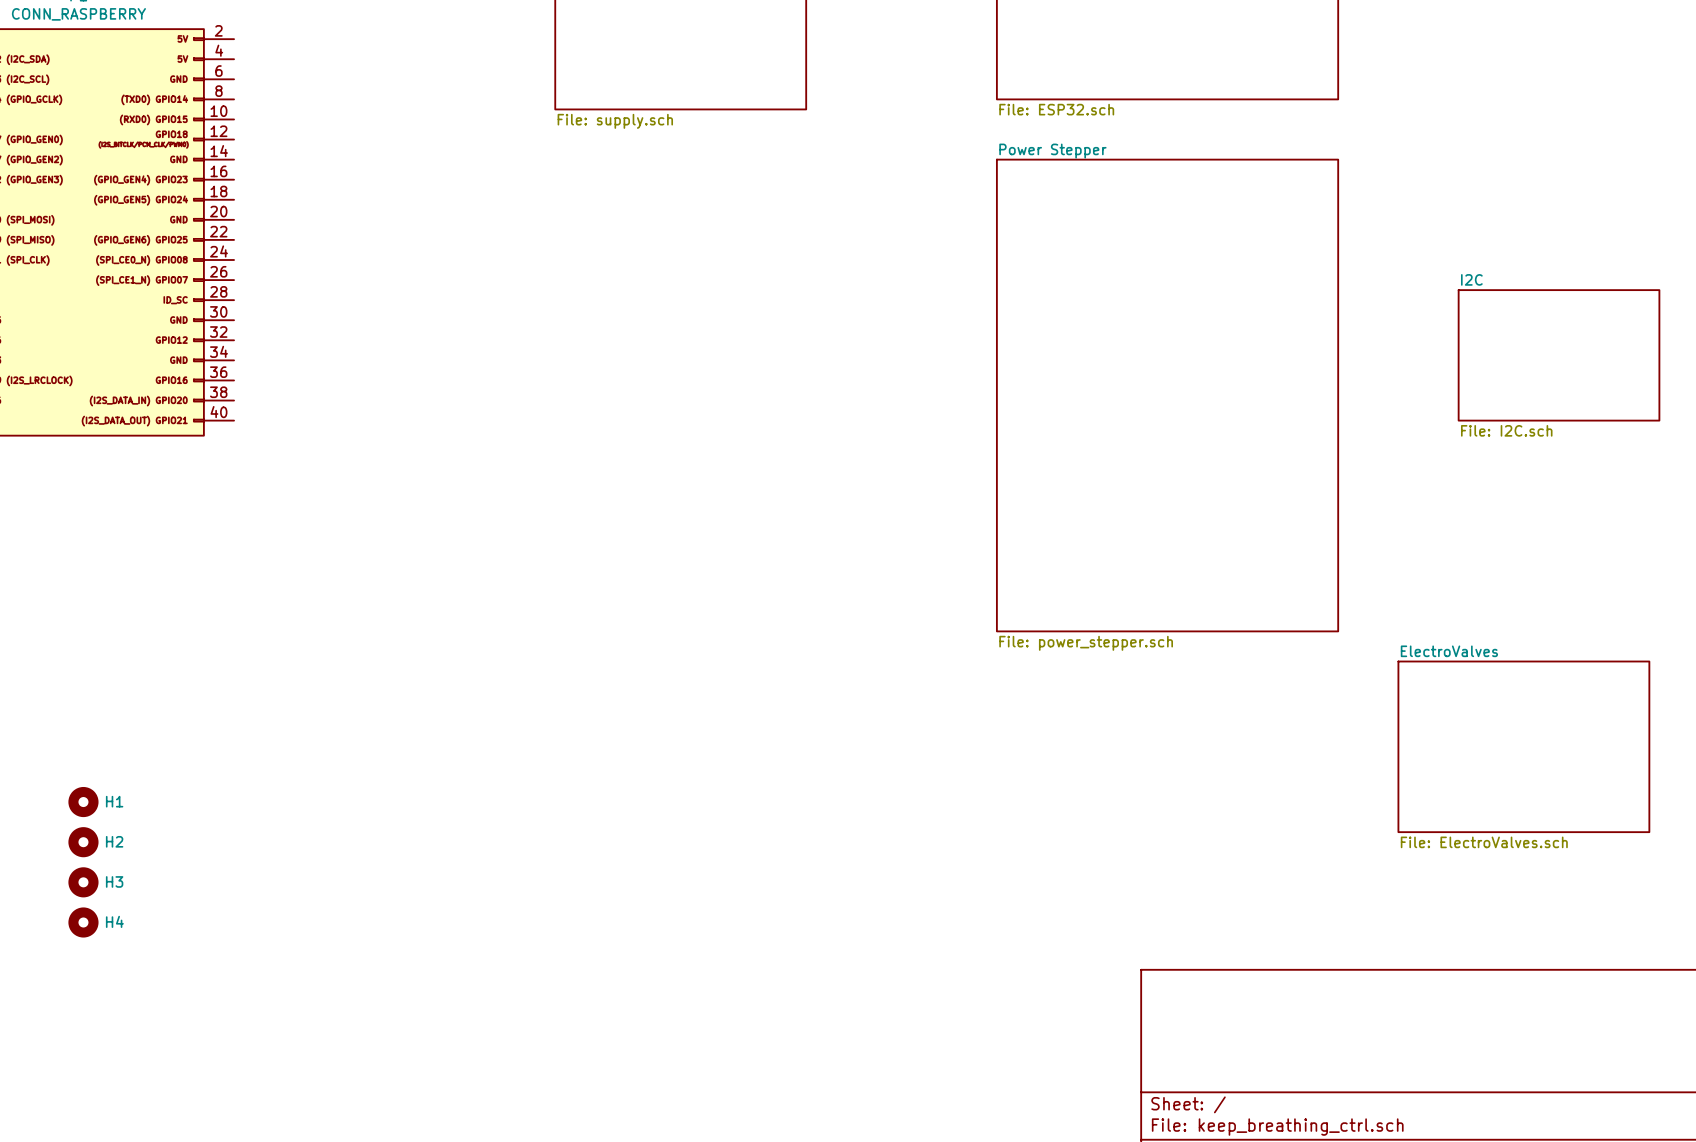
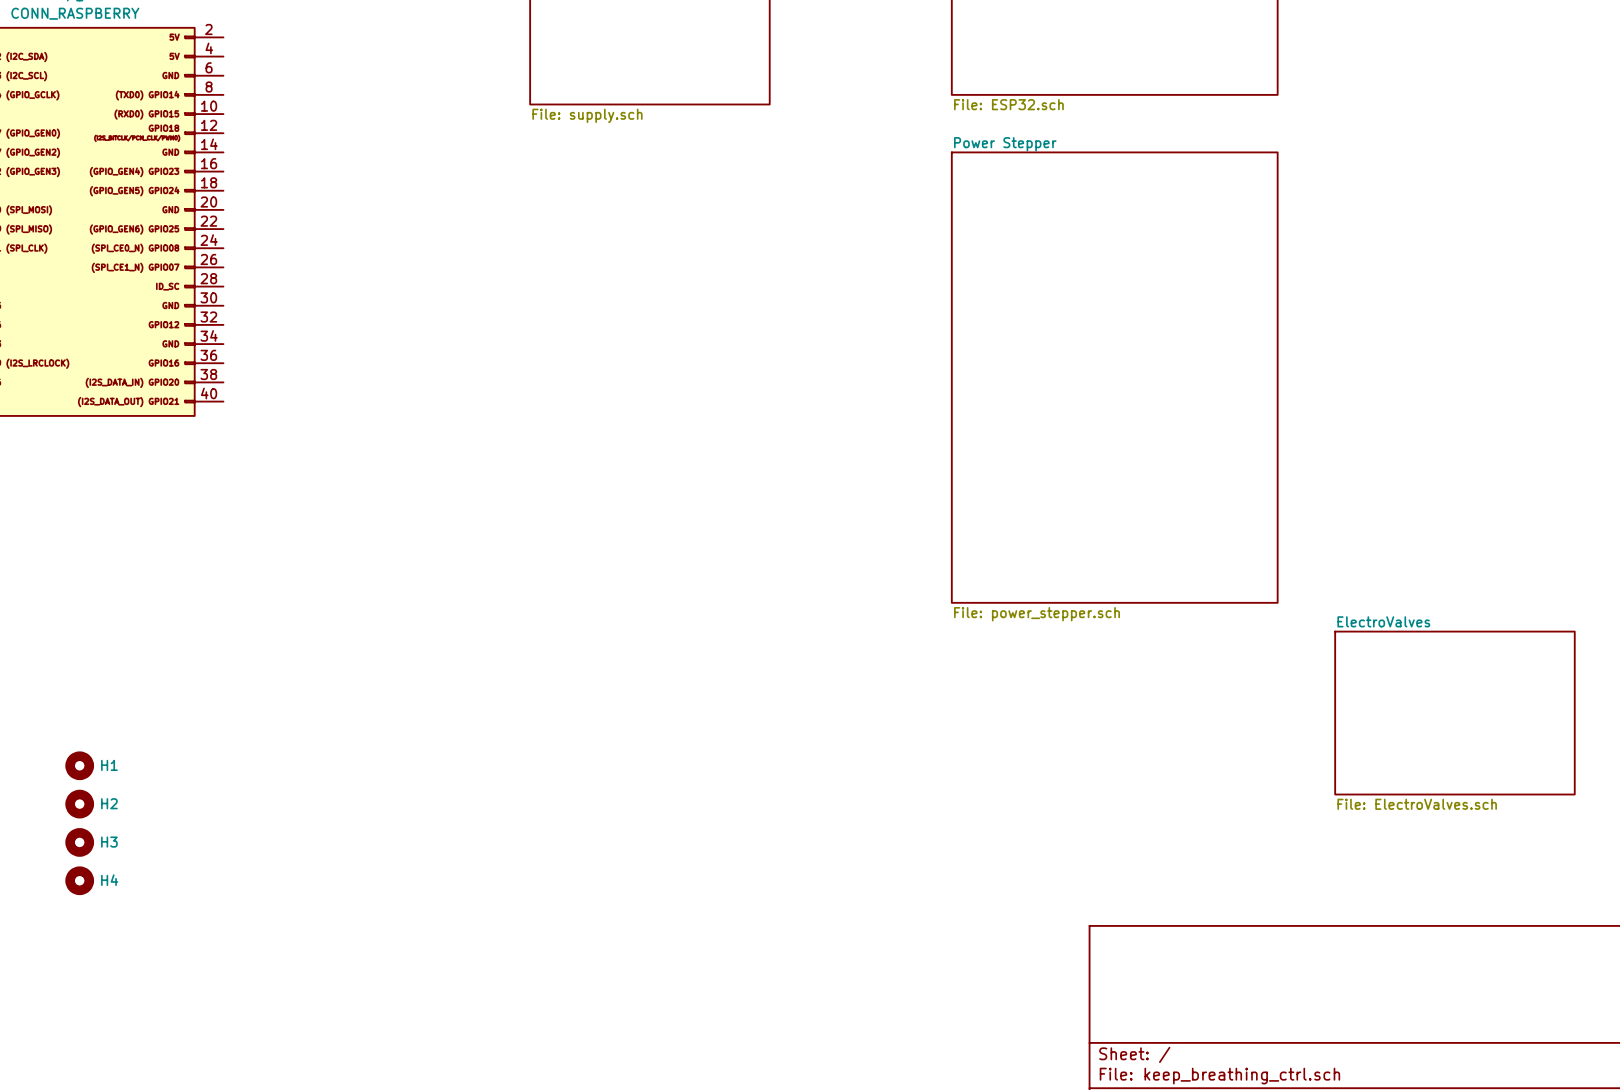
sheet I2C: File: I2C.sch (1559, 355) -> none

